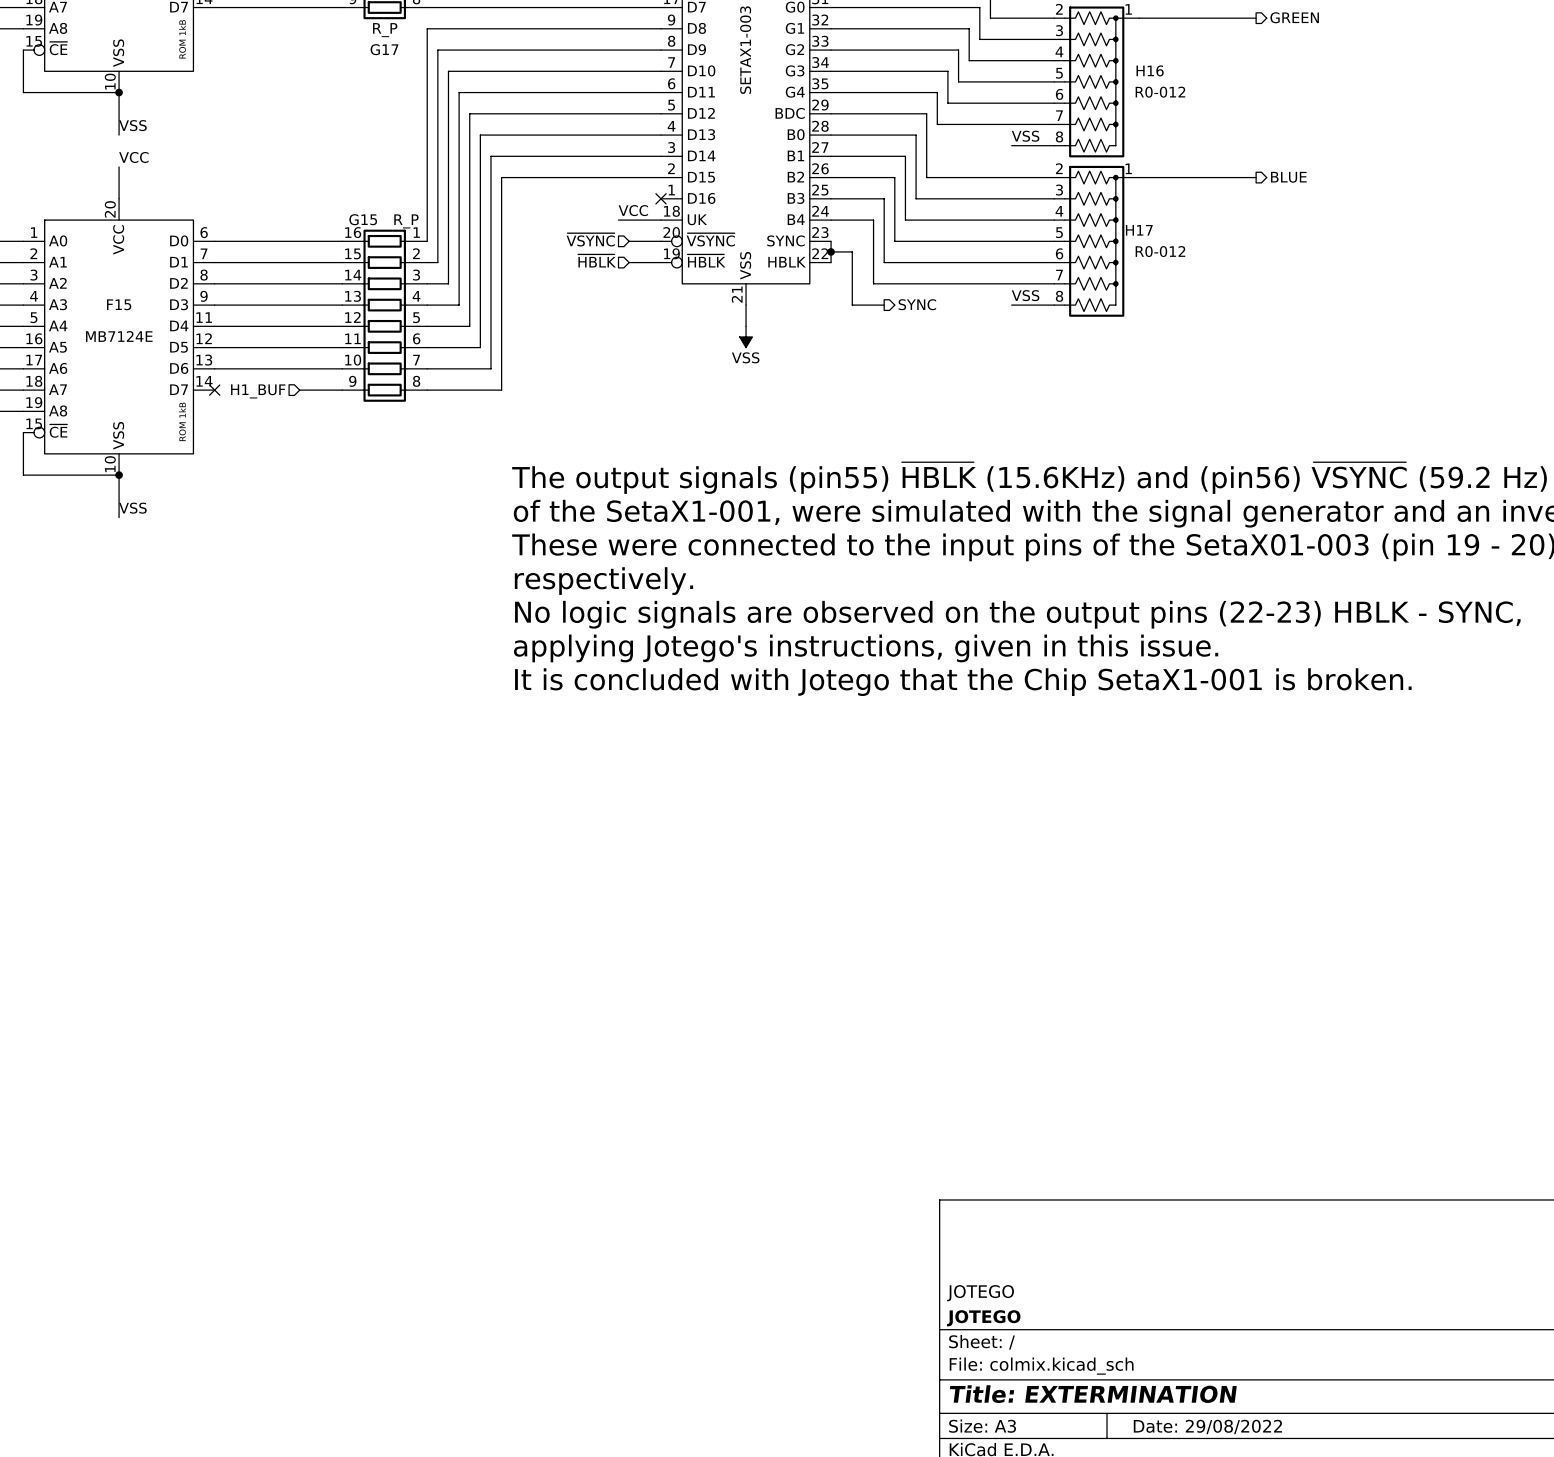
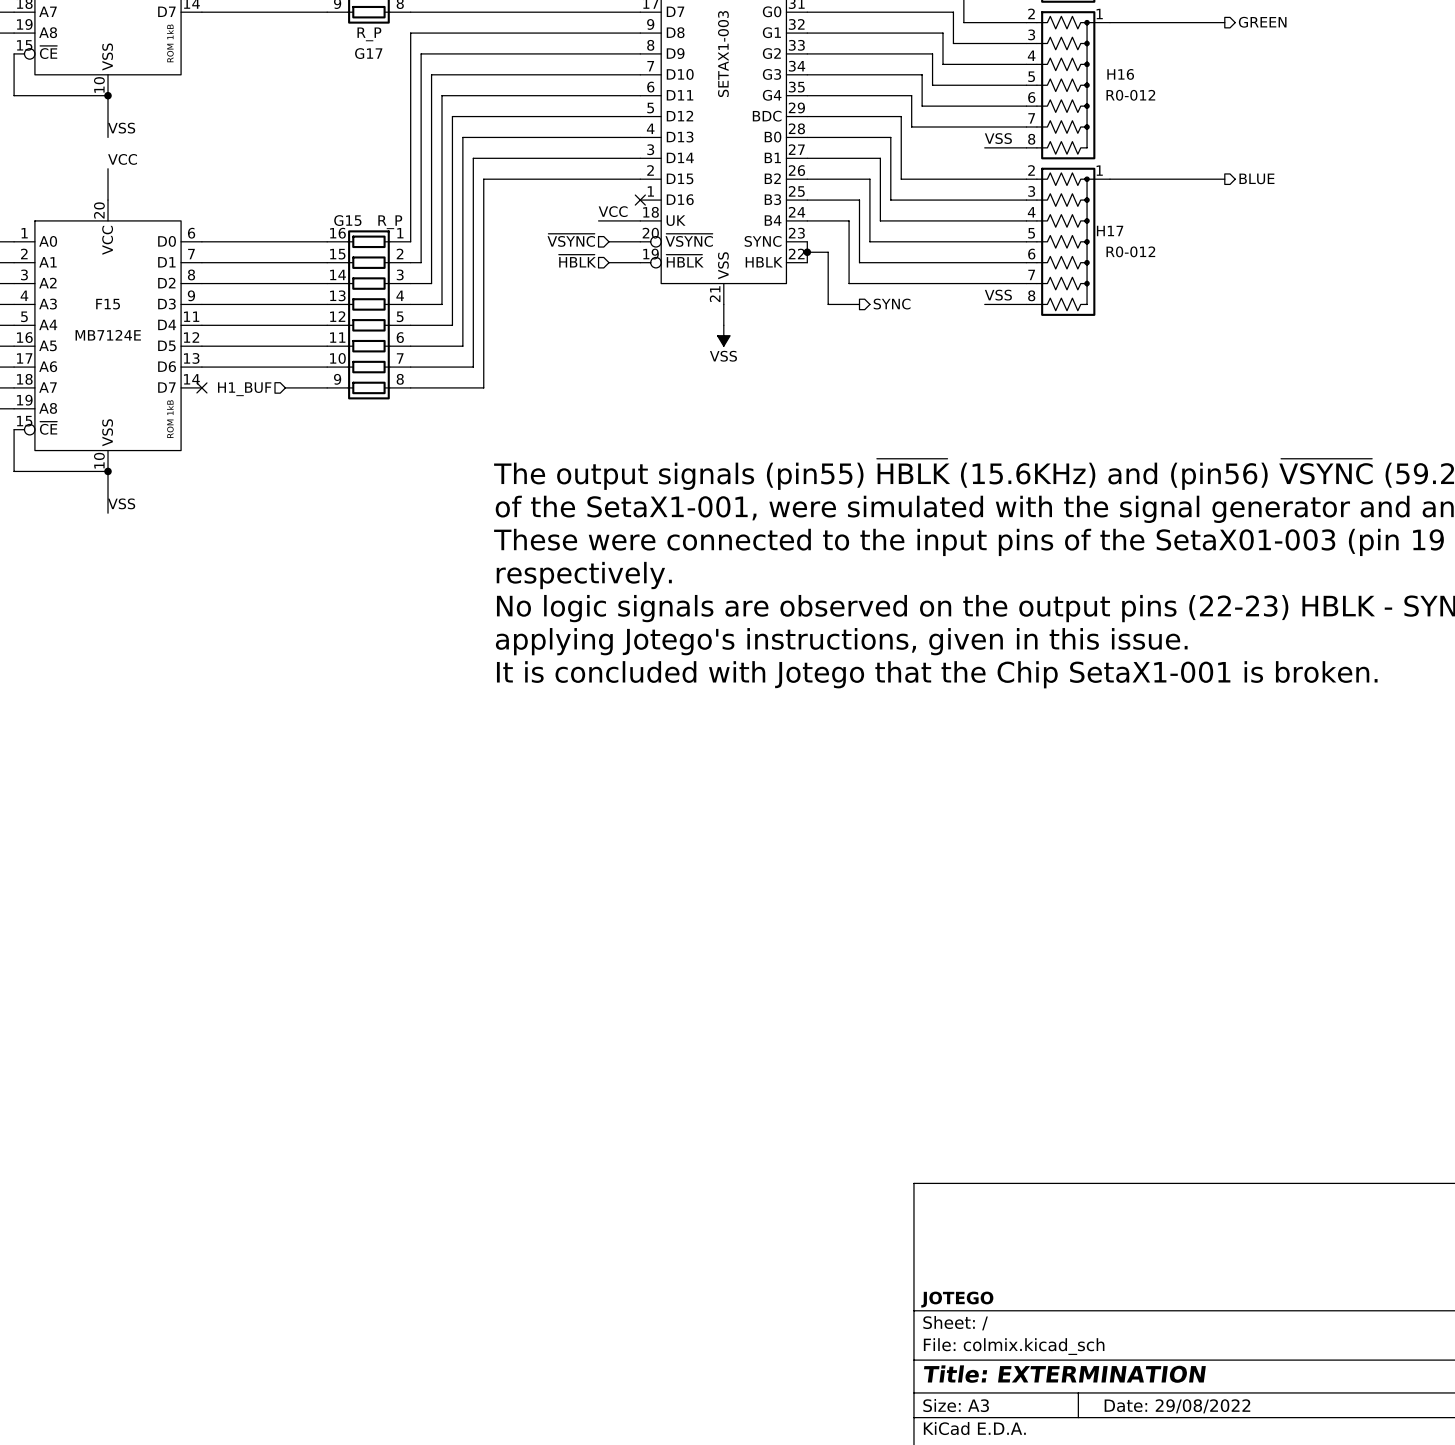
title block: JOTEGO (980, 1293) -> none

